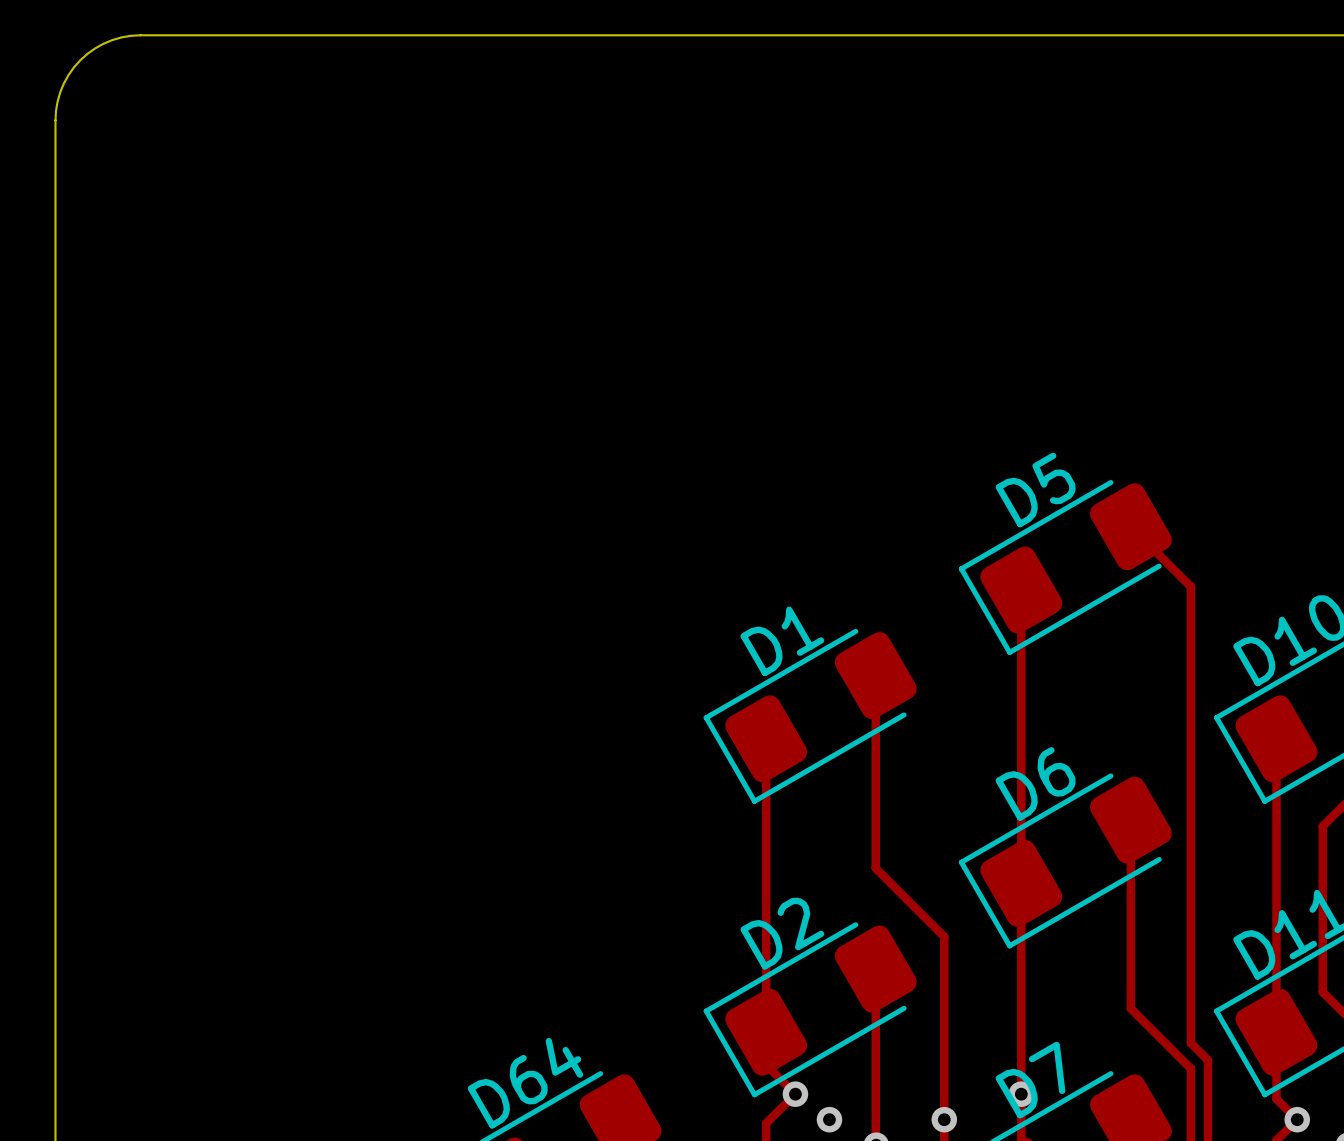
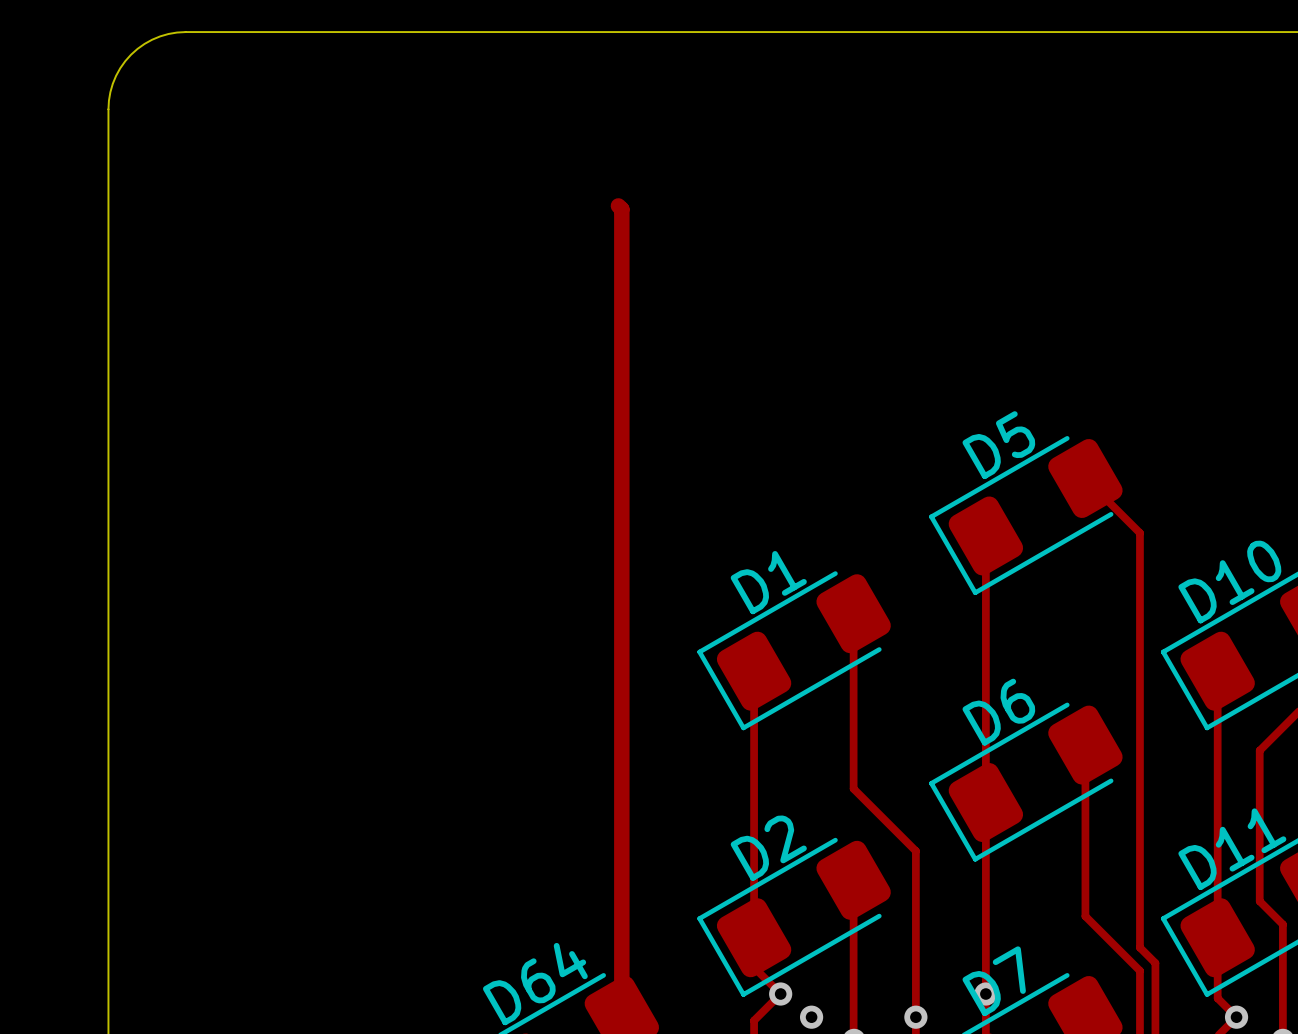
track: none -> (618, 205) (621, 209) (621, 1015)

